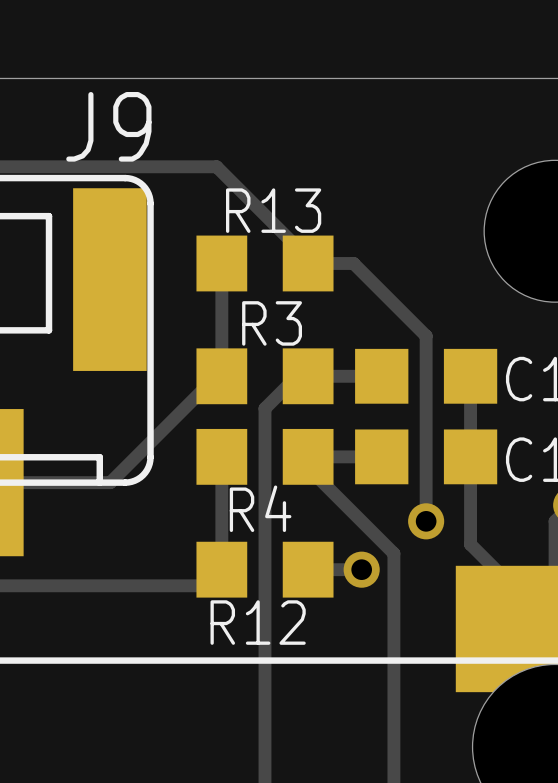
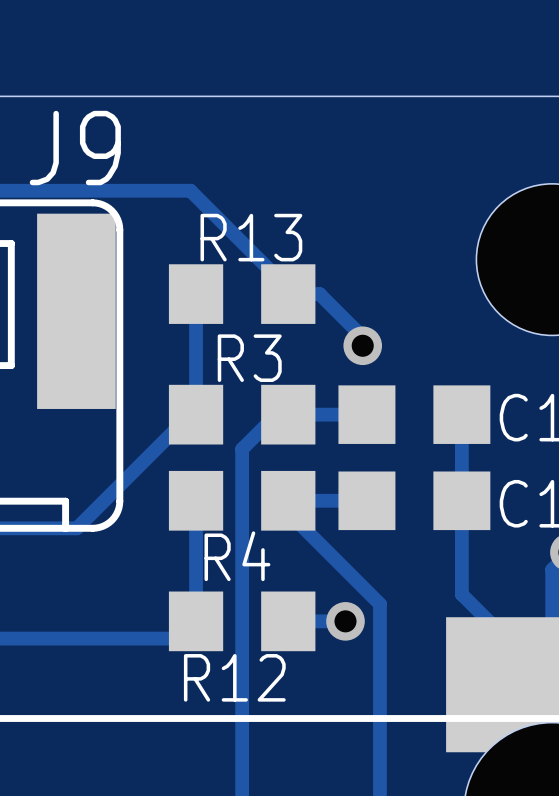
track: (337, 263) (353, 263) (426, 336) (426, 521) -> (319, 294) (362, 337) (362, 345)
via position: (426, 521) -> (362, 345)

